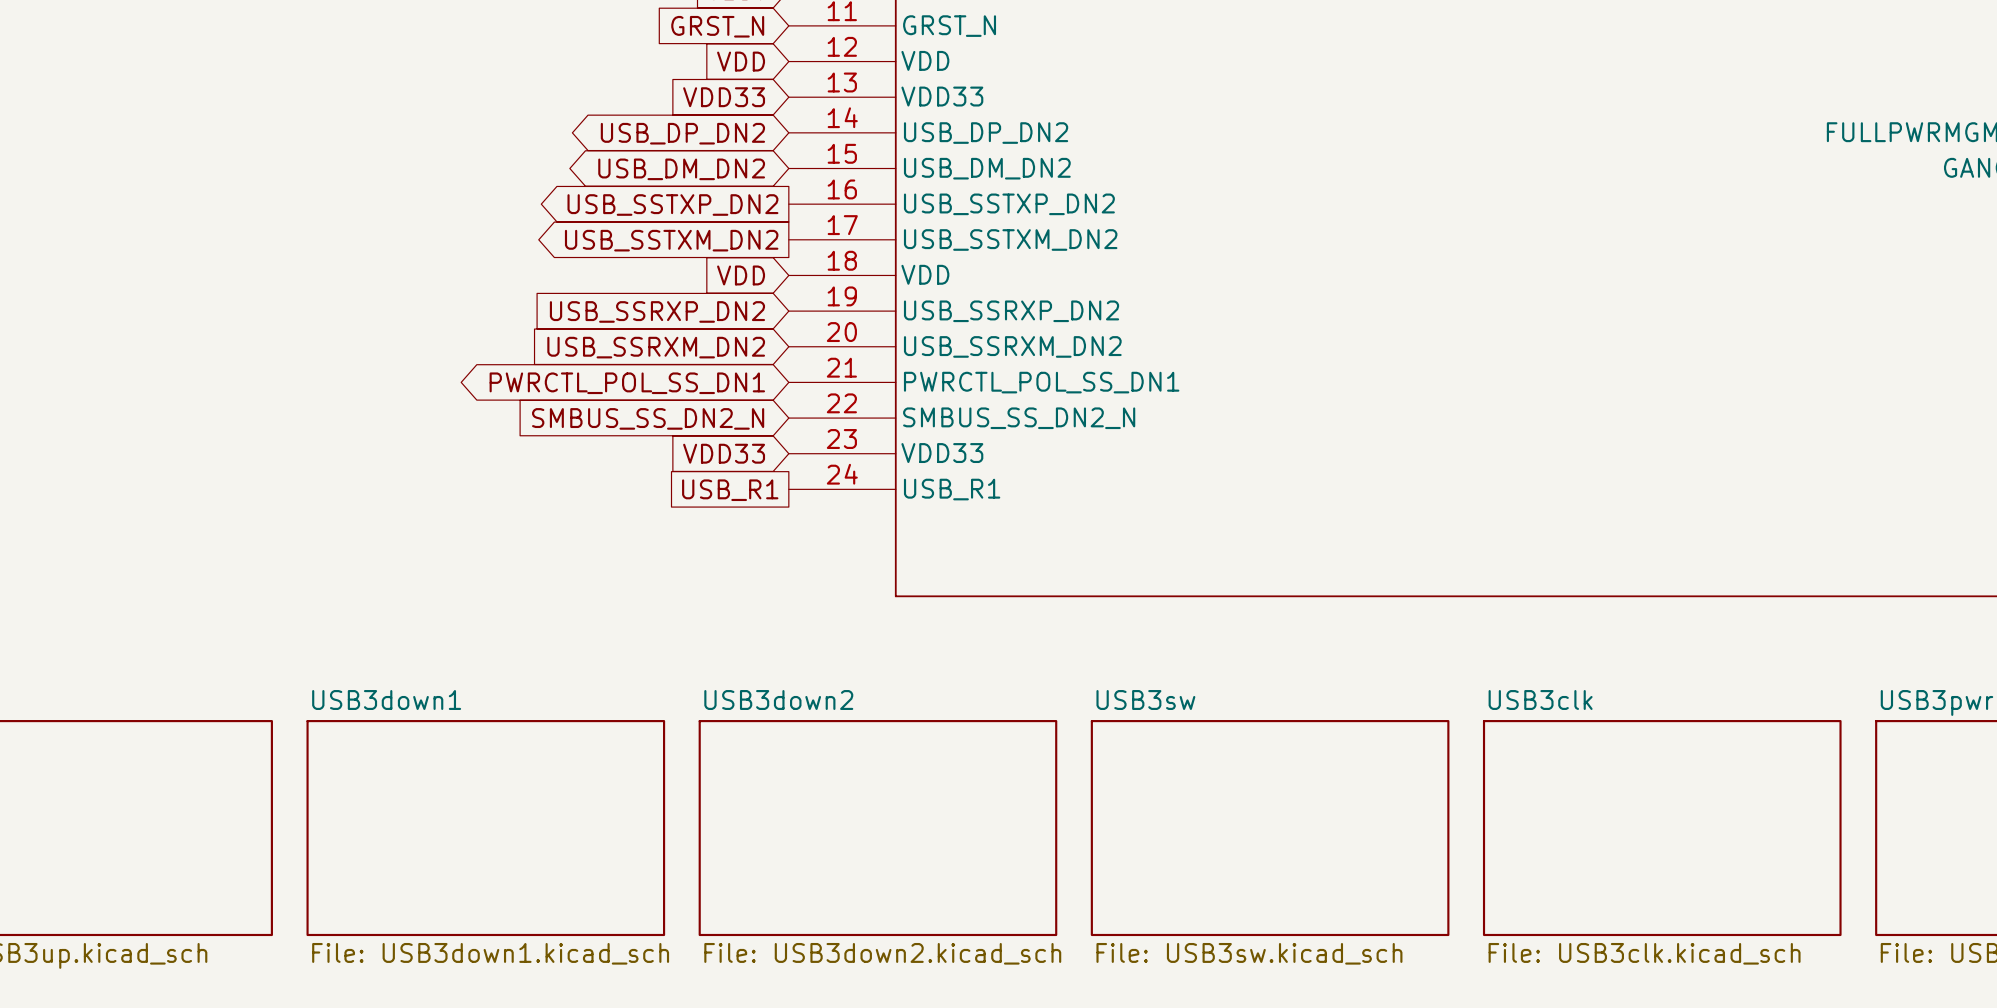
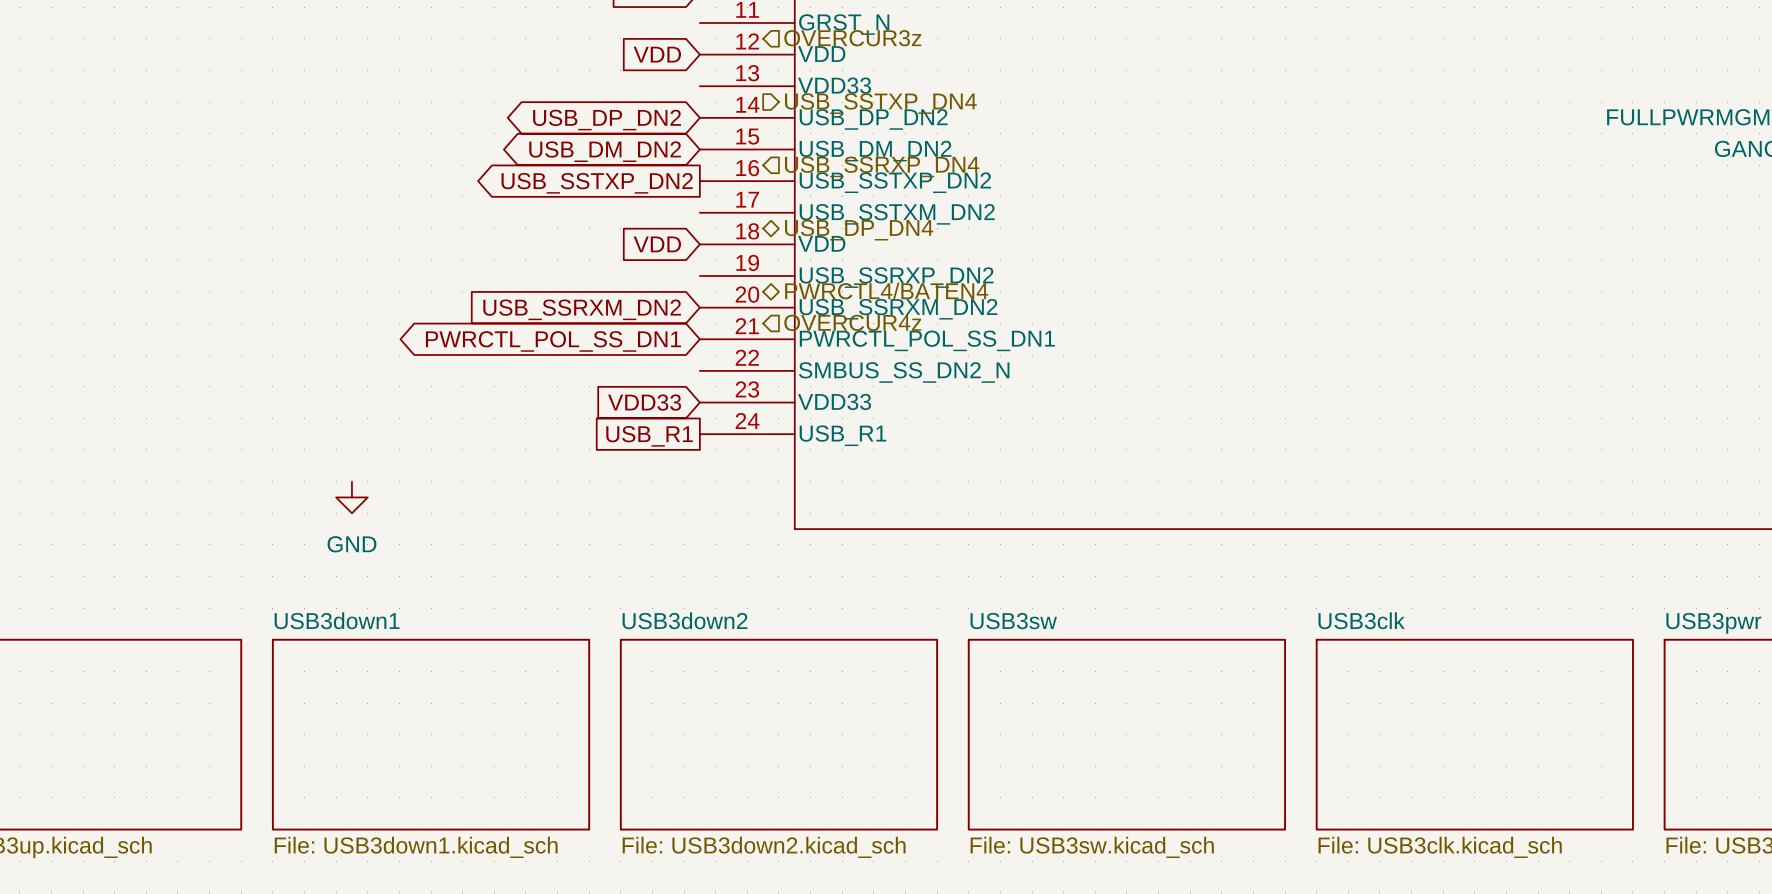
global label: GRST_N (717, 26) -> none
hierarchical label: none -> OVERCUR3z (852, 38)
global label: VDD33 (724, 97) -> none
hierarchical label: none -> USB_SSTXP_DN4 (880, 103)
hierarchical label: none -> USB_SSRXP_DN4 (882, 166)
global label: USB_SSTXM_DN2 (671, 240) -> none
hierarchical label: none -> USB_DP_DN4 (859, 230)
global label: USB_SSRXP_DN2 (657, 311) -> none
hierarchical label: none -> PWRCTL4/BATEN4 (886, 290)
hierarchical label: none -> OVERCUR4z (852, 322)
global label: SMBUS_SS_DN2_N (648, 418) -> none
power symbol: none -> GND (351, 497)

